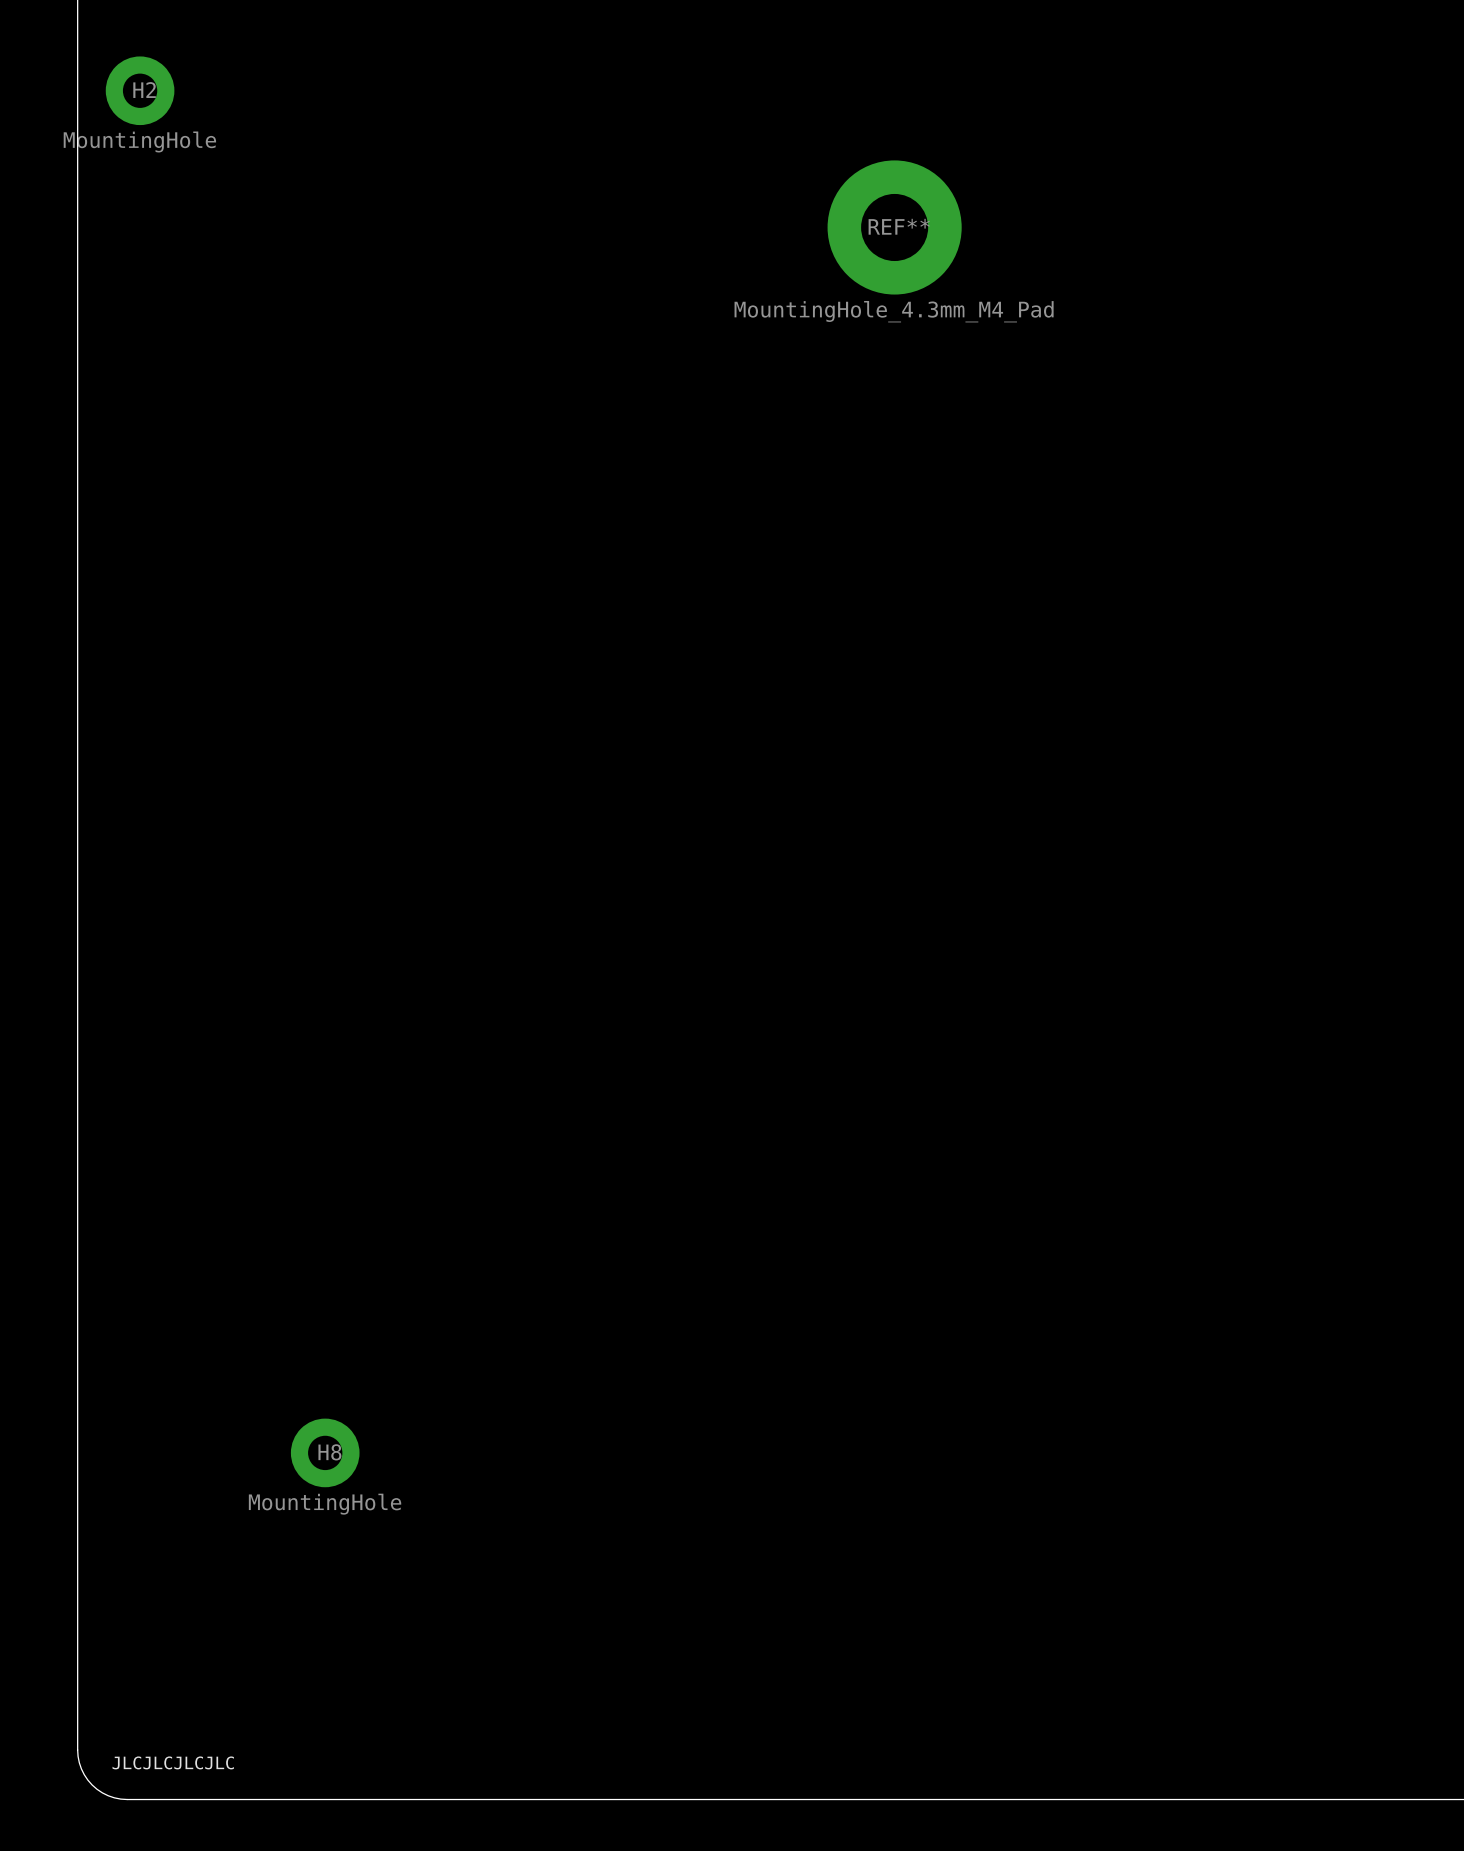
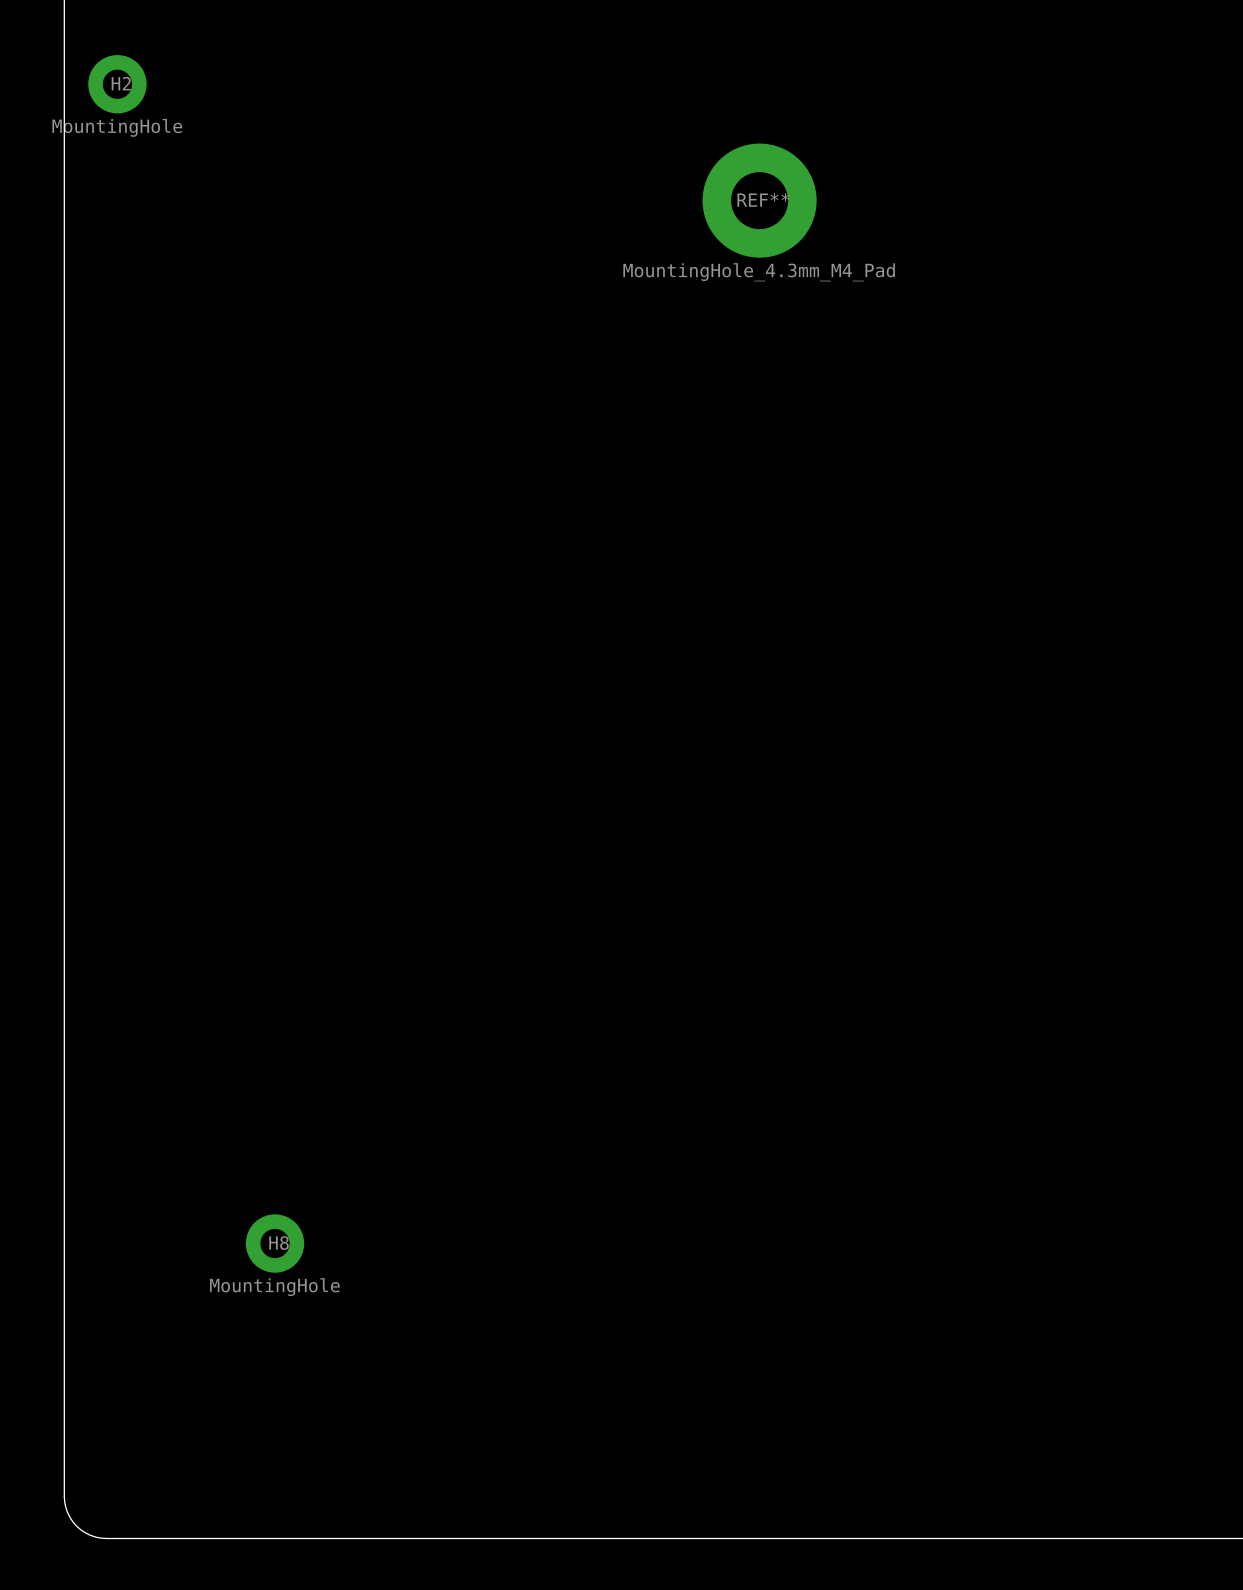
text: JLCJLCJLCJLC (173, 1762) -> none

